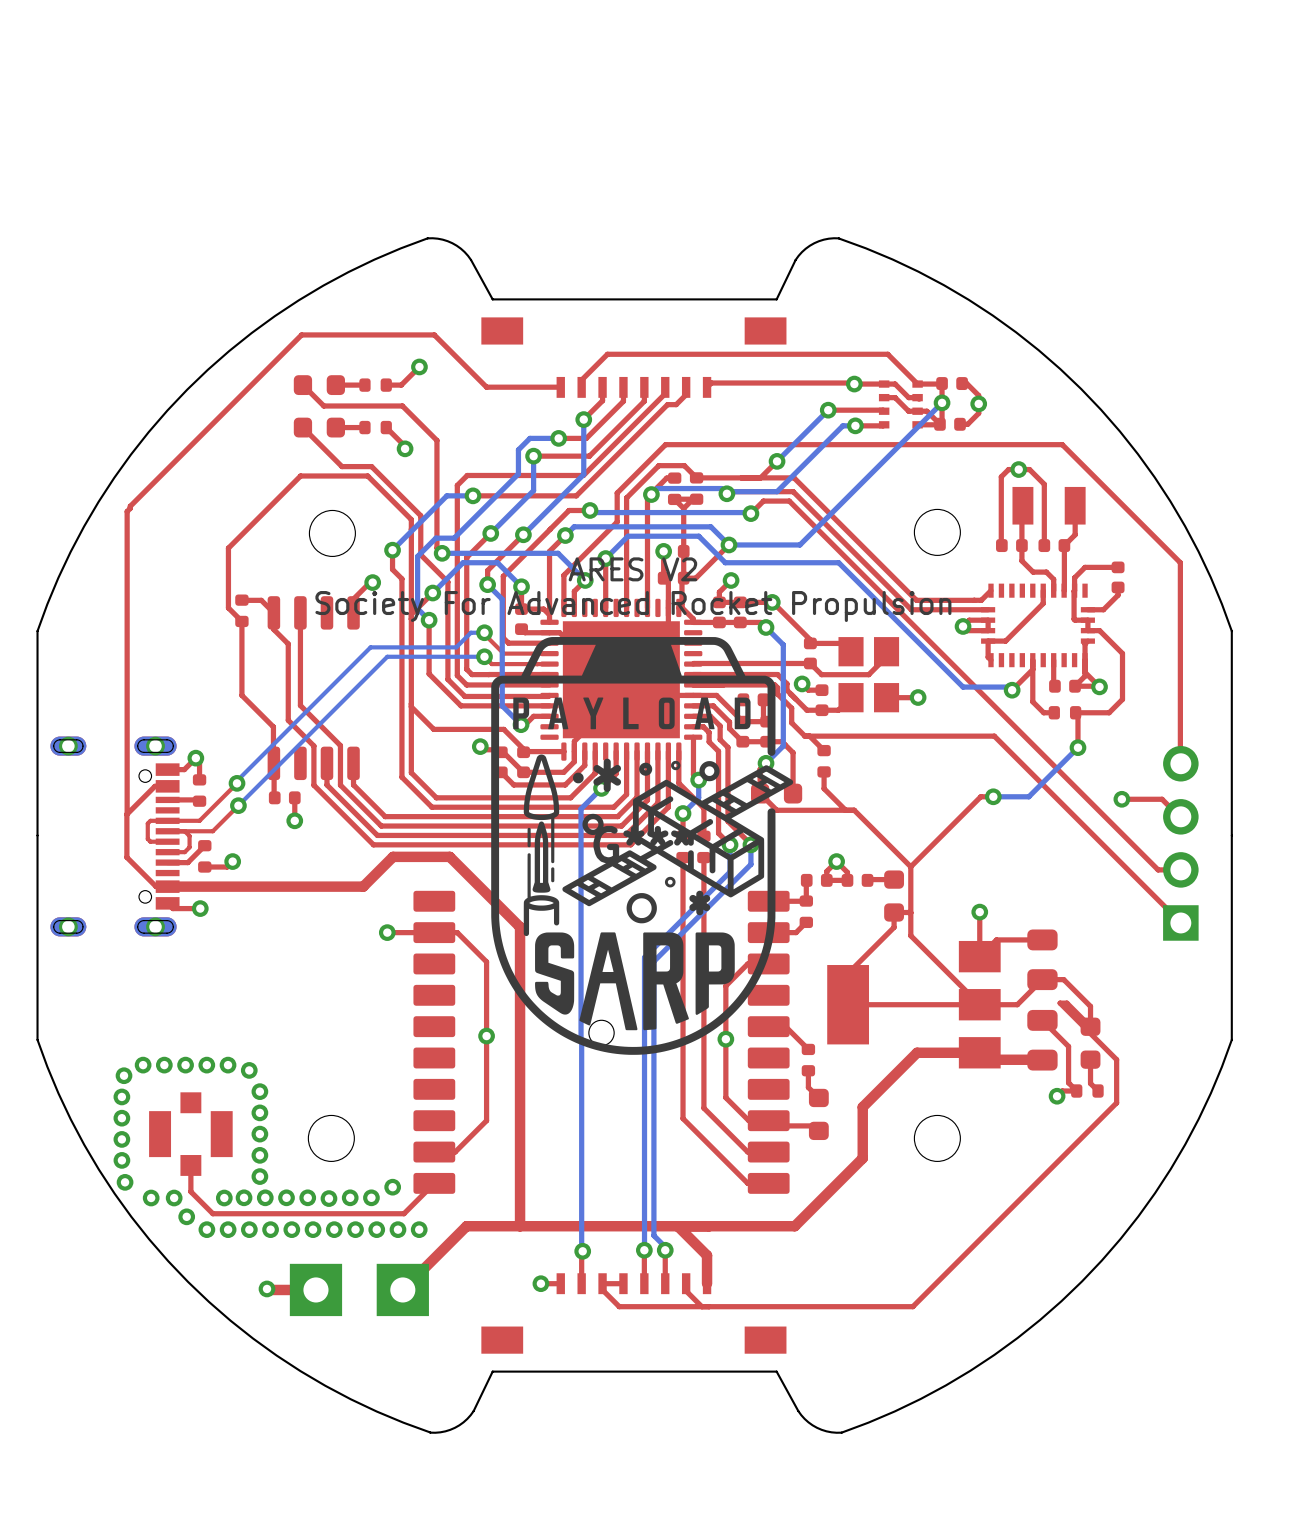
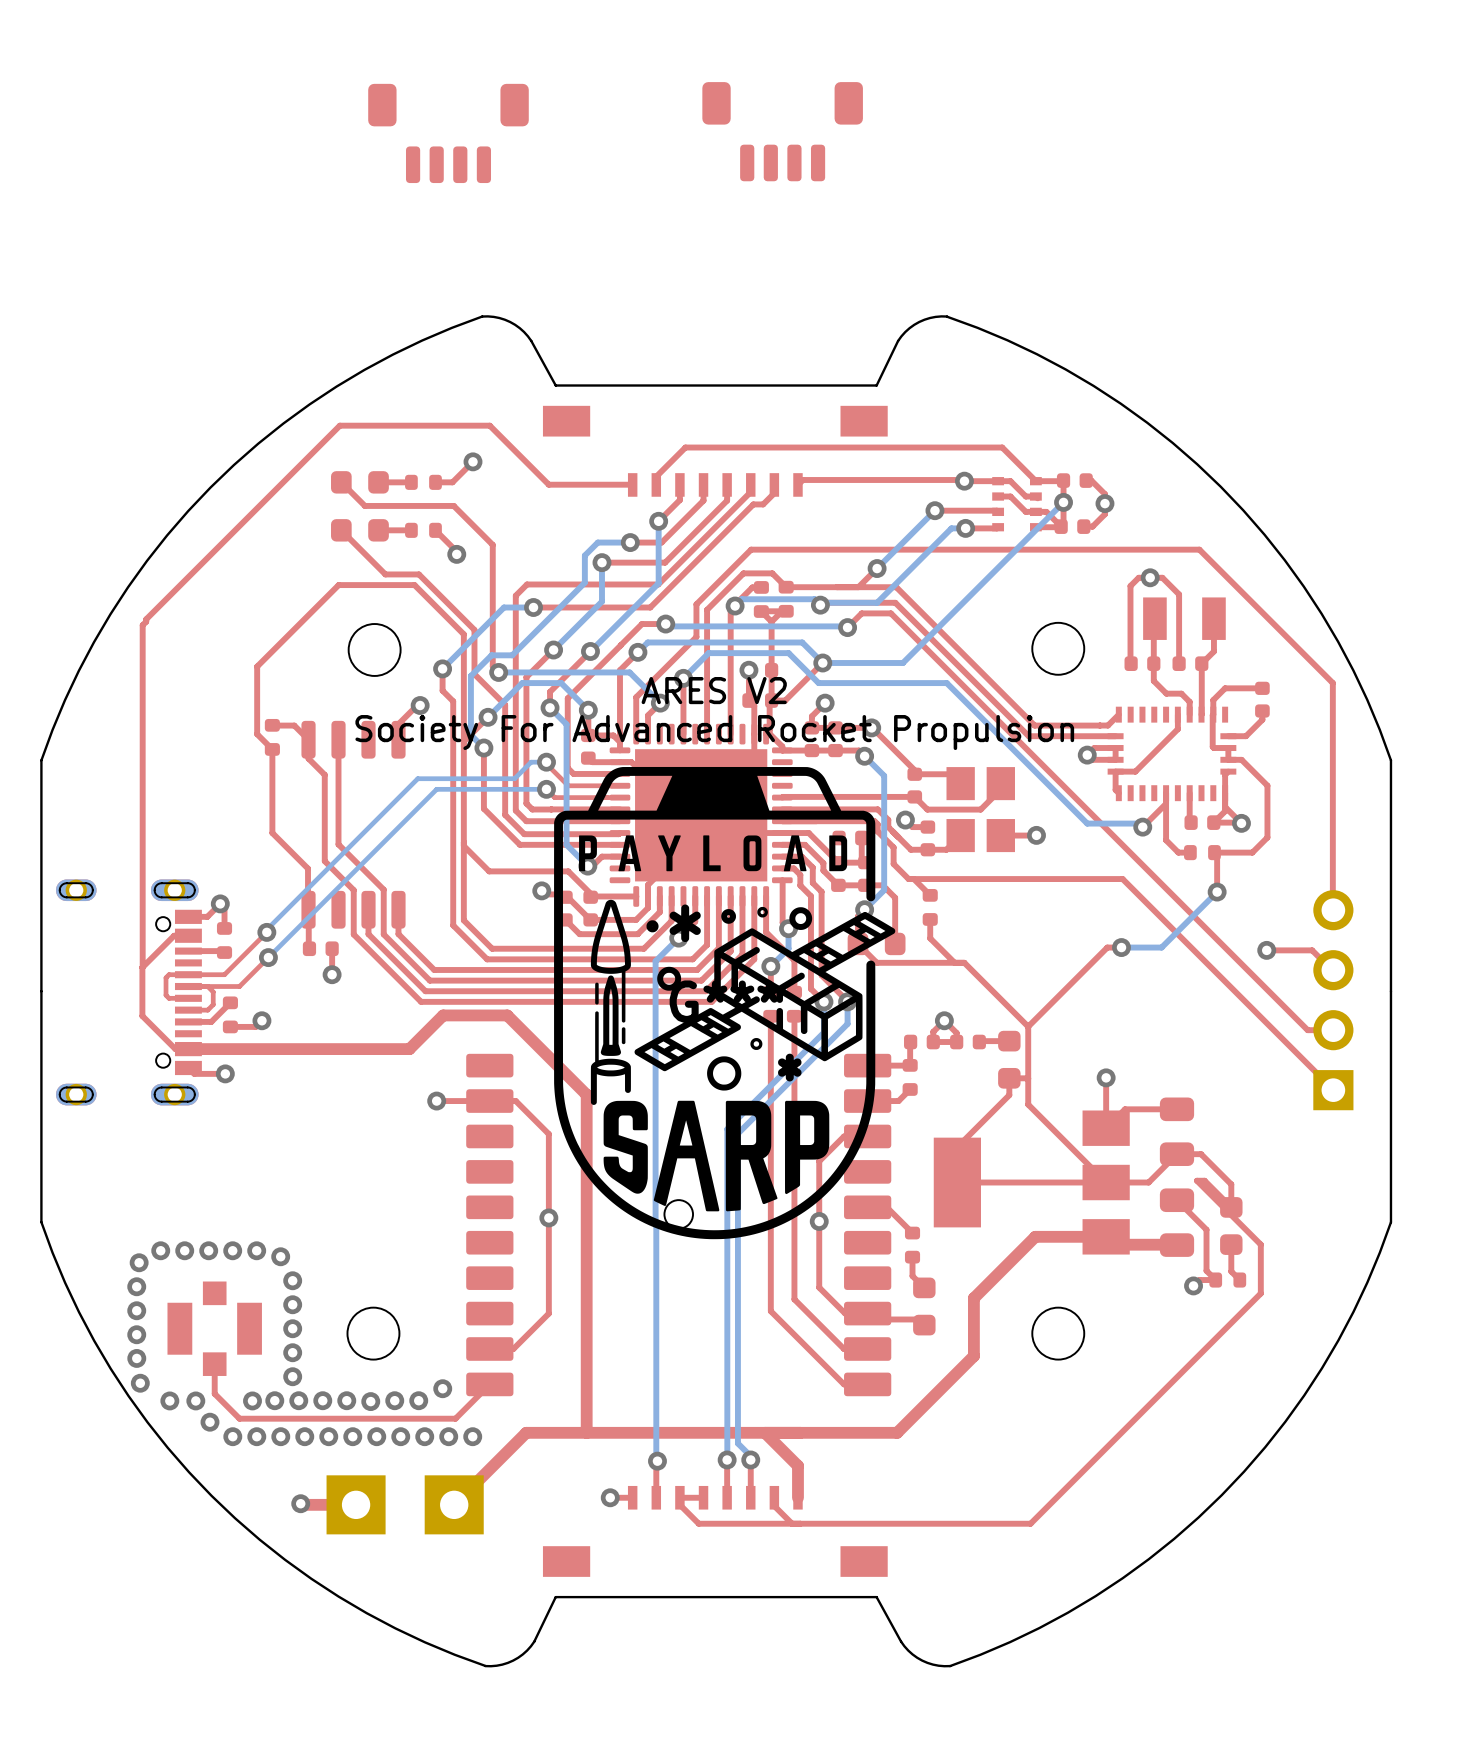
part: none -> (782, 131)
part: none -> (448, 133)

